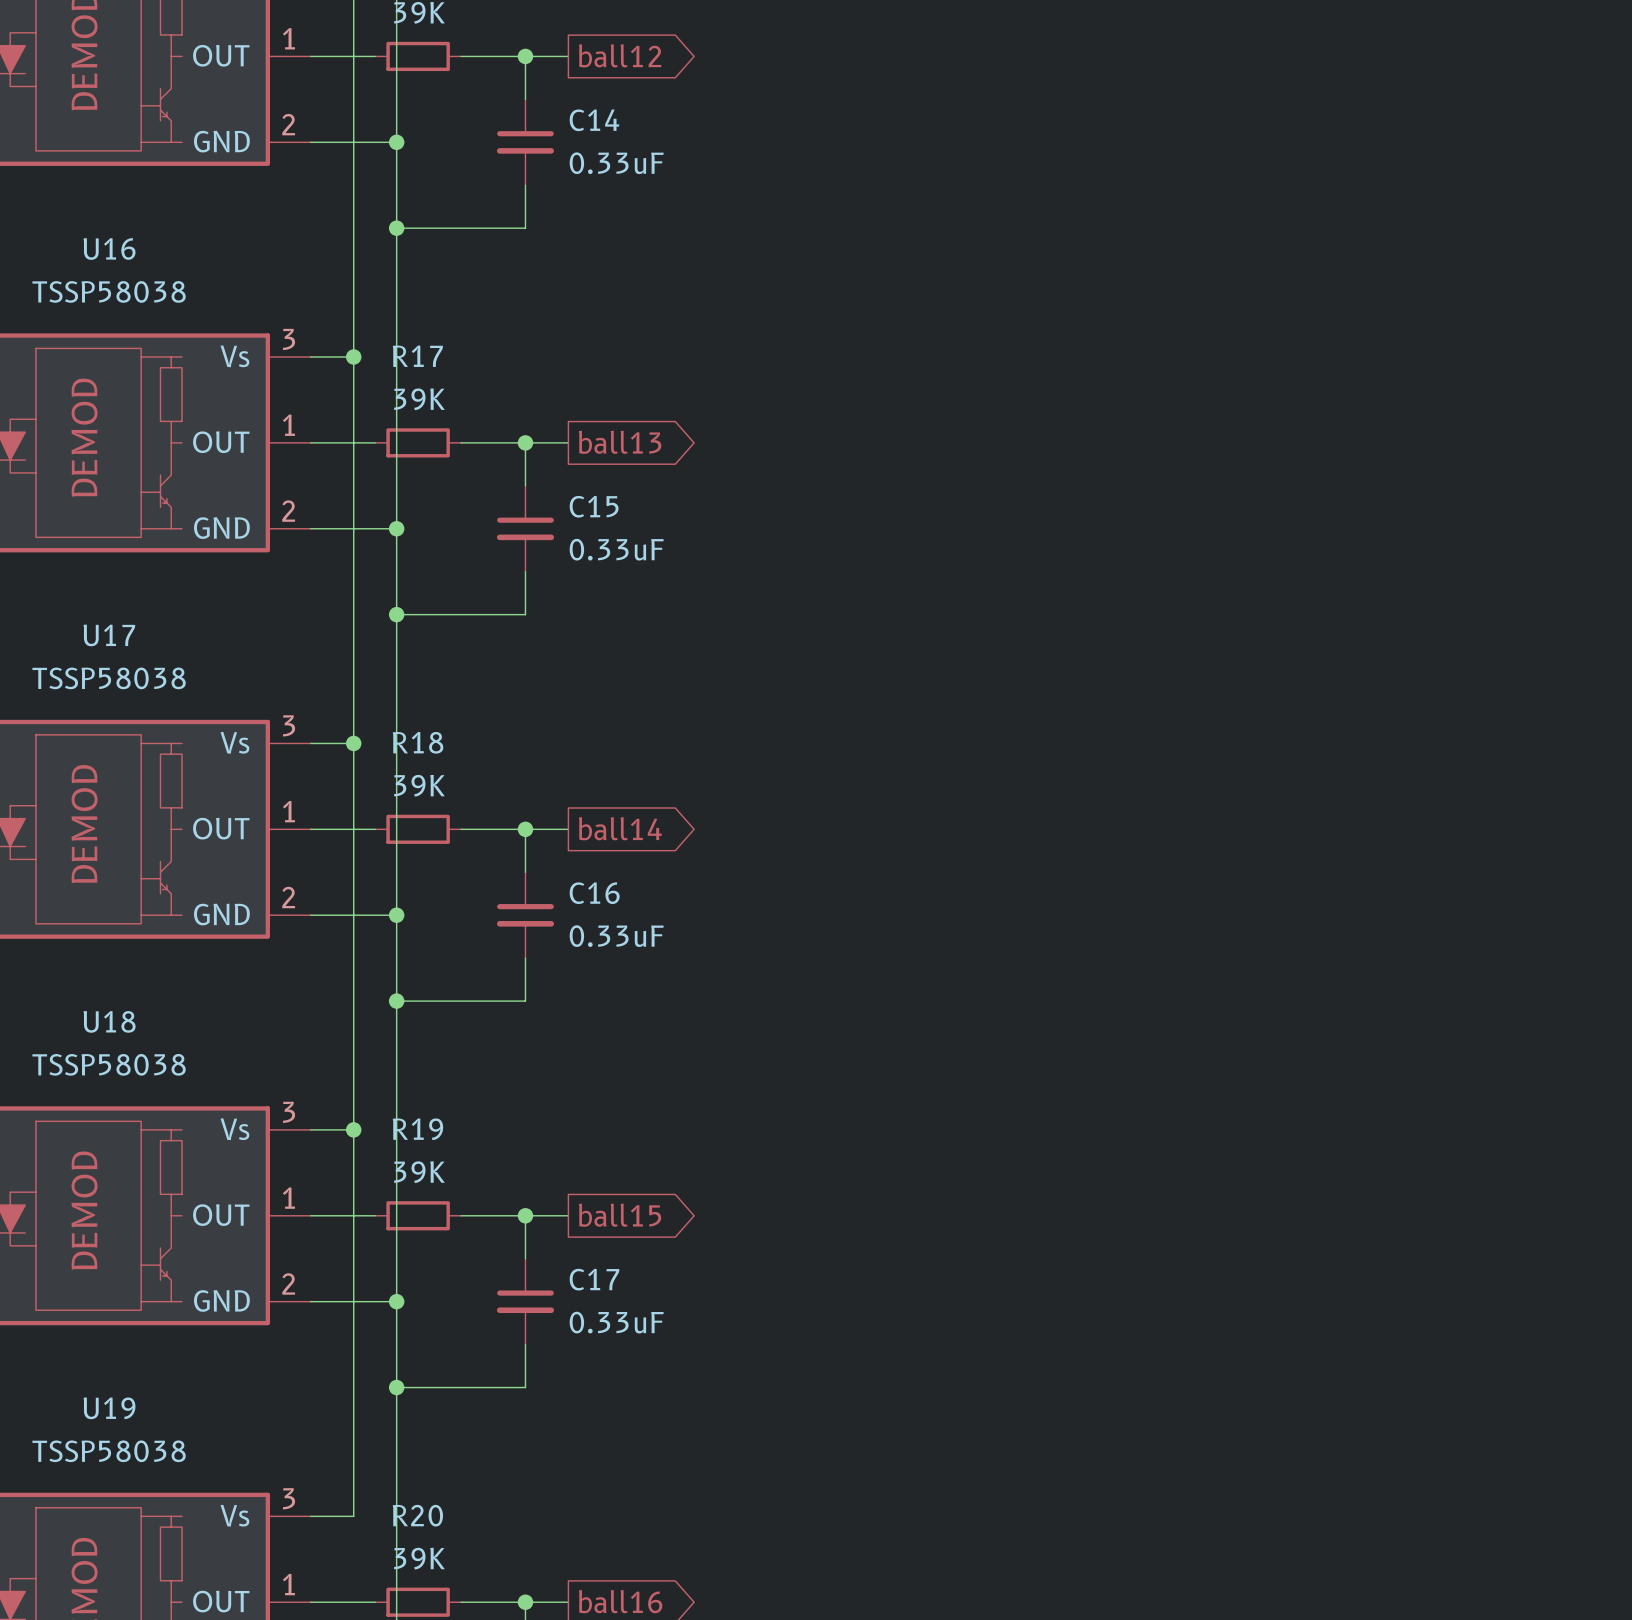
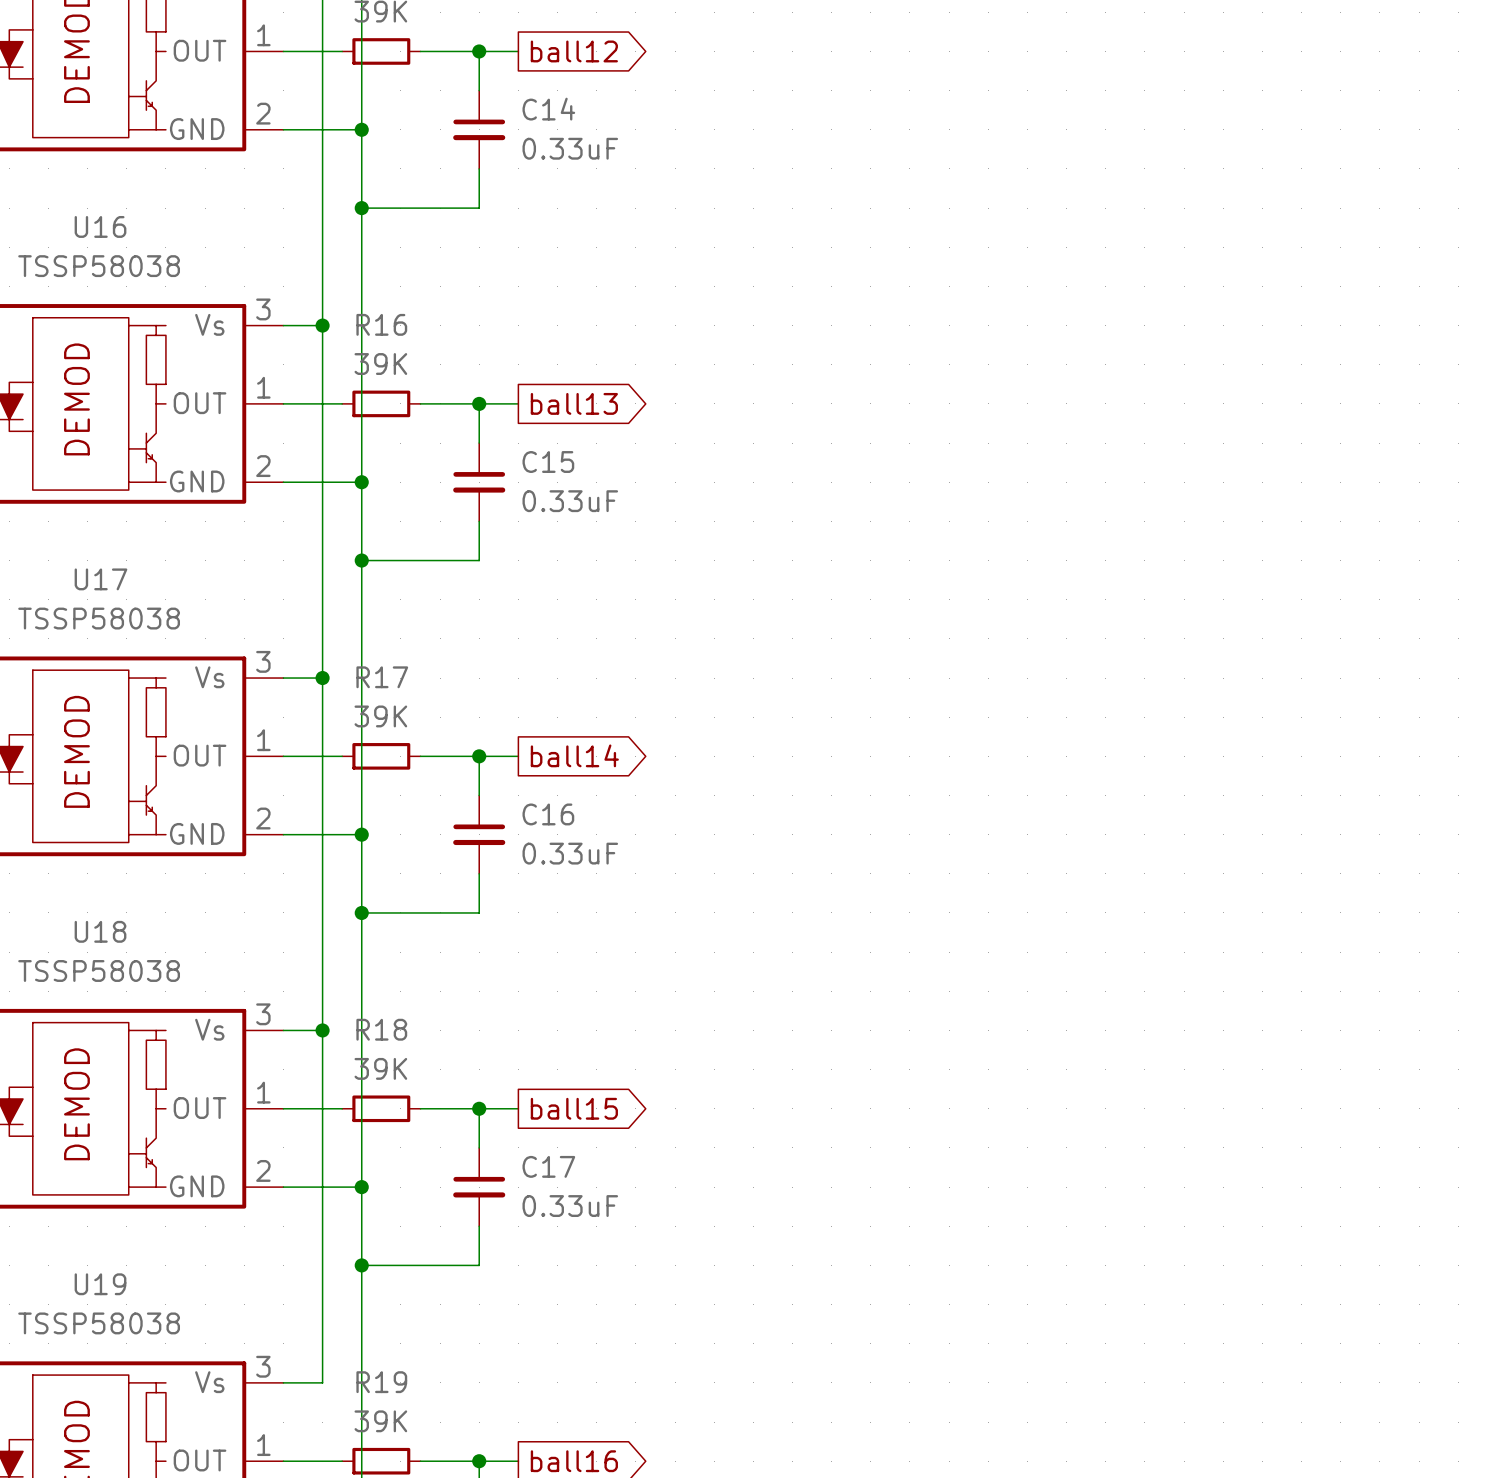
R17 name: R17 (417, 356) -> R16 (381, 324)
R18 name: R18 (418, 742) -> R17 (382, 677)
R19 name: R19 (417, 1129) -> R18 (381, 1029)
R20 name: R20 (417, 1515) -> R19 (381, 1382)

